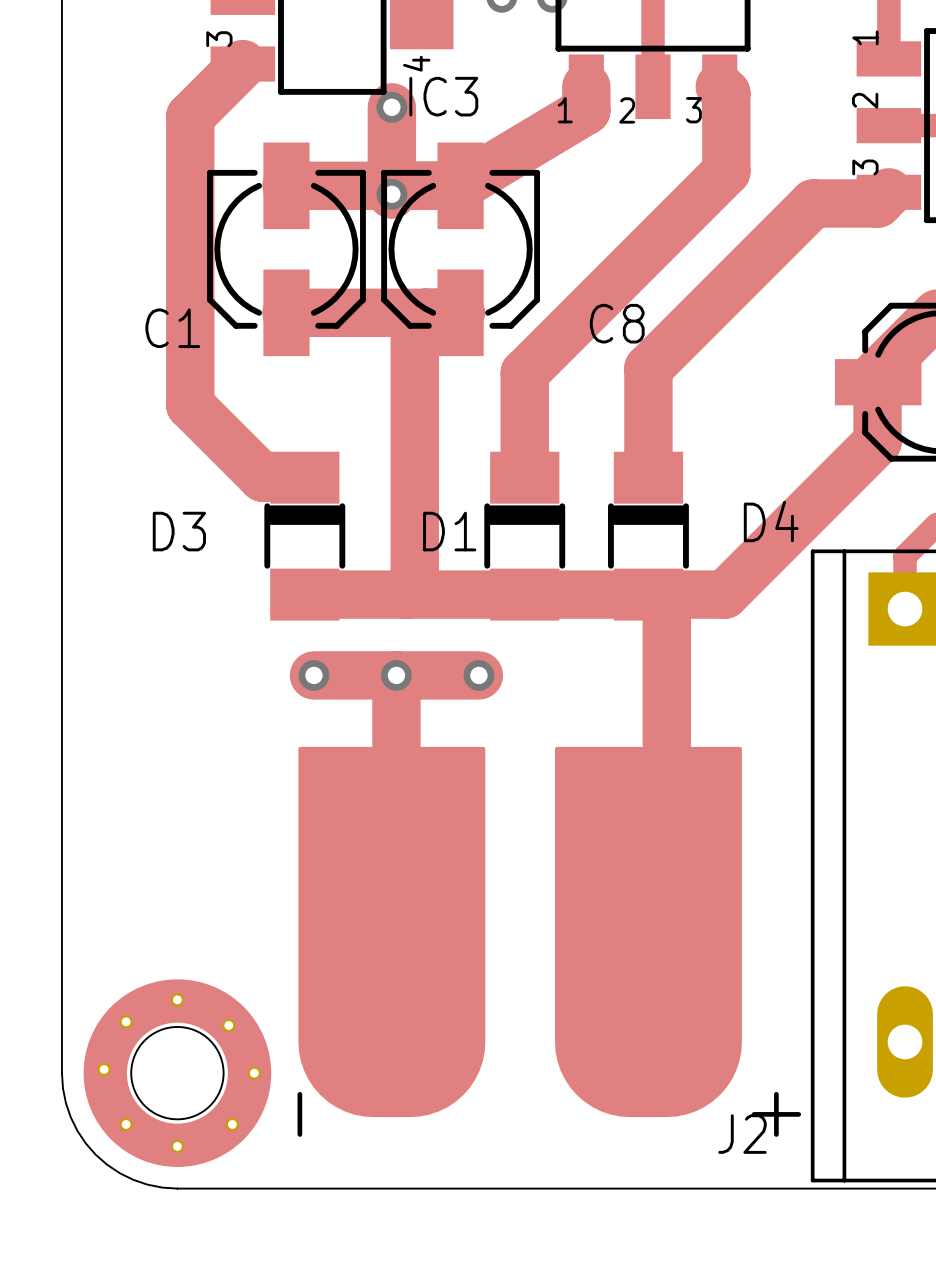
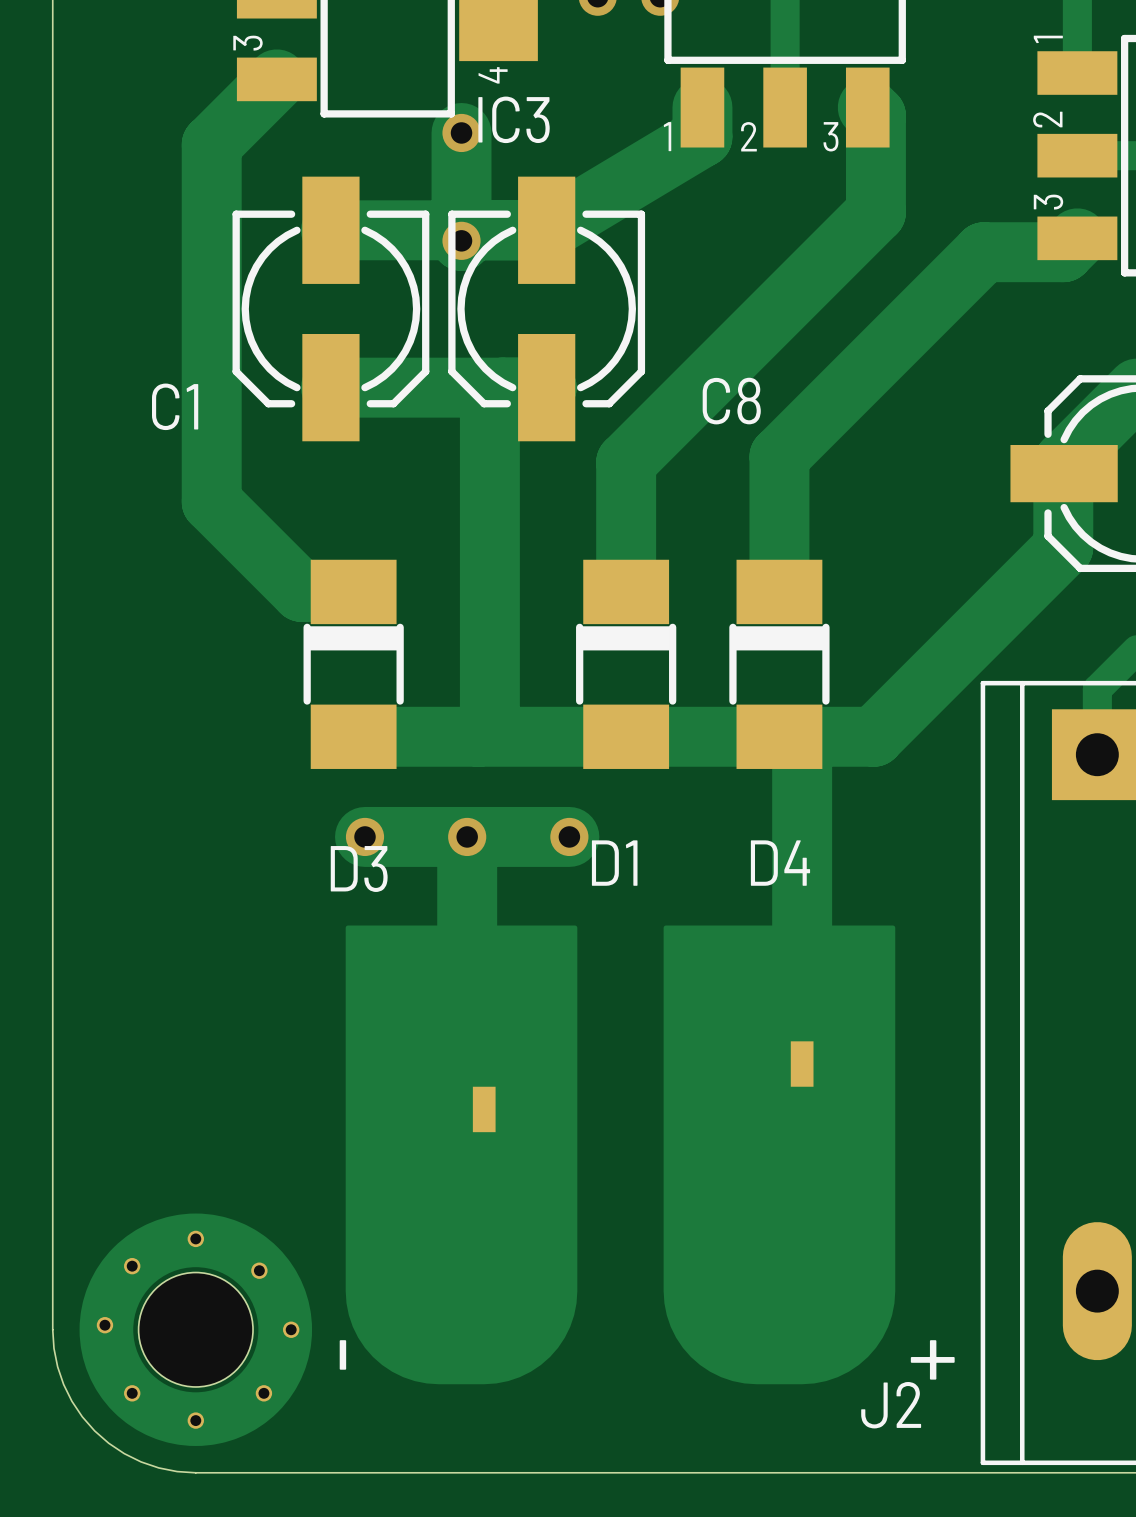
D4 name position: D4 (771, 521) -> D4 (780, 863)
D3 name position: D3 (179, 531) -> D3 (359, 869)
D1 name position: D1 (449, 531) -> D1 (614, 863)

